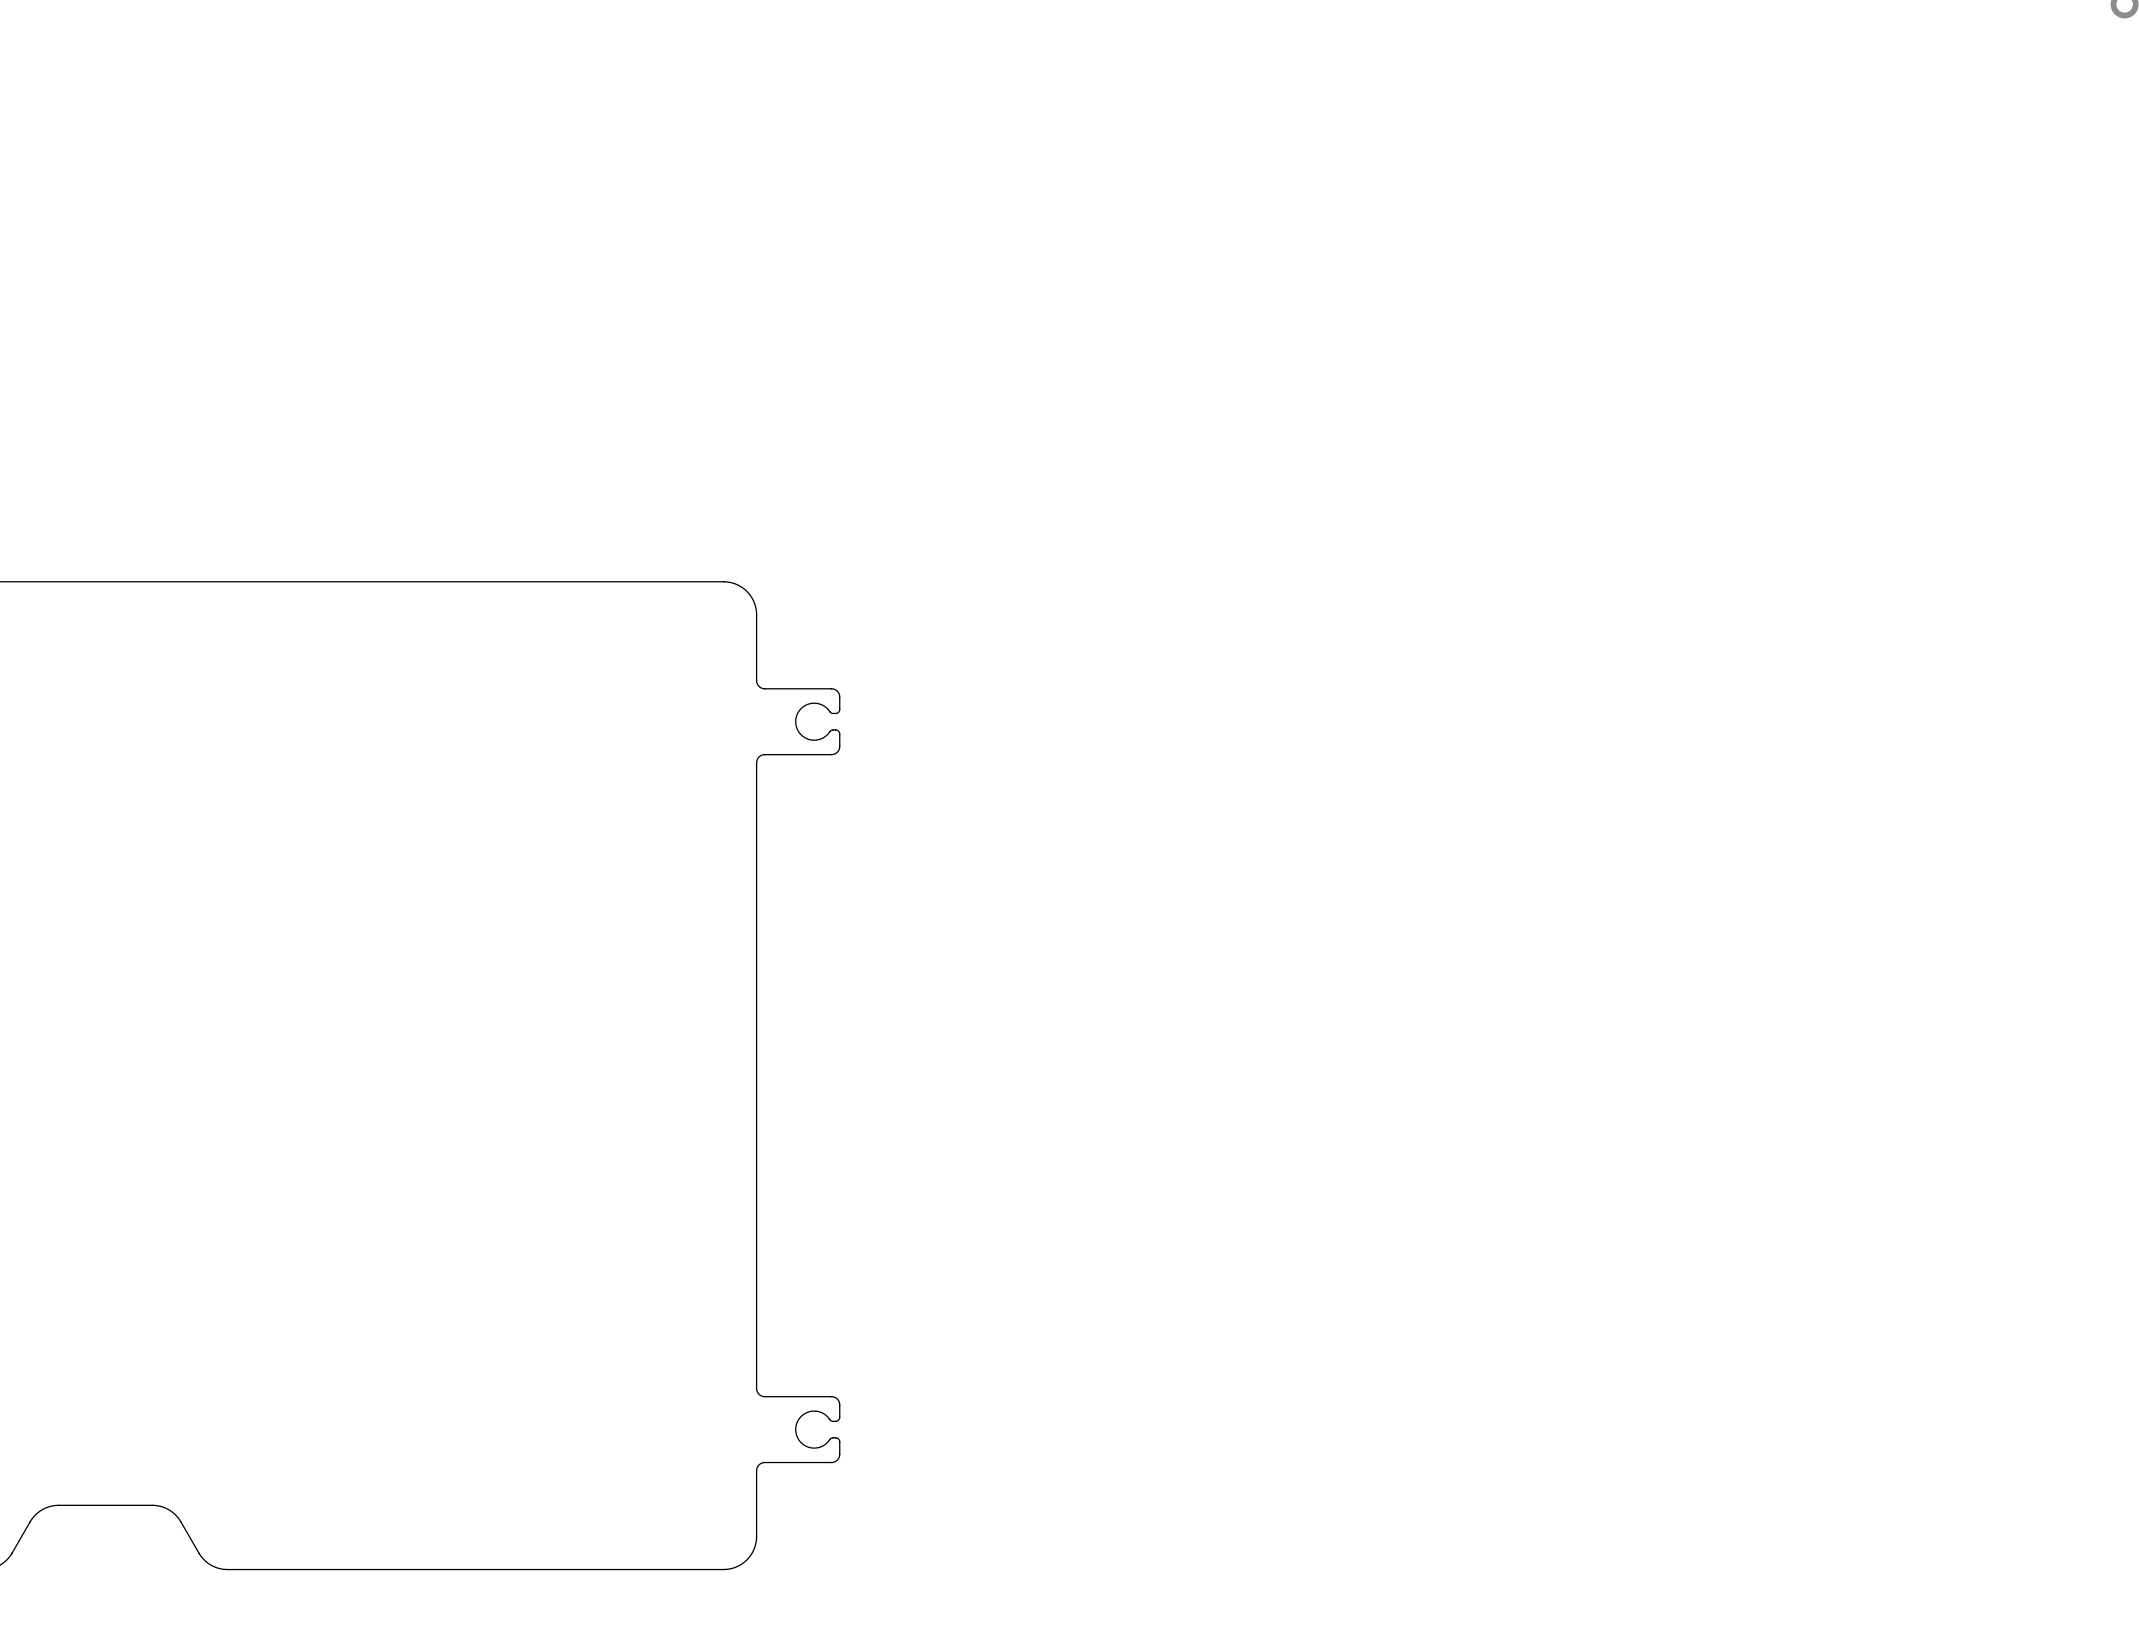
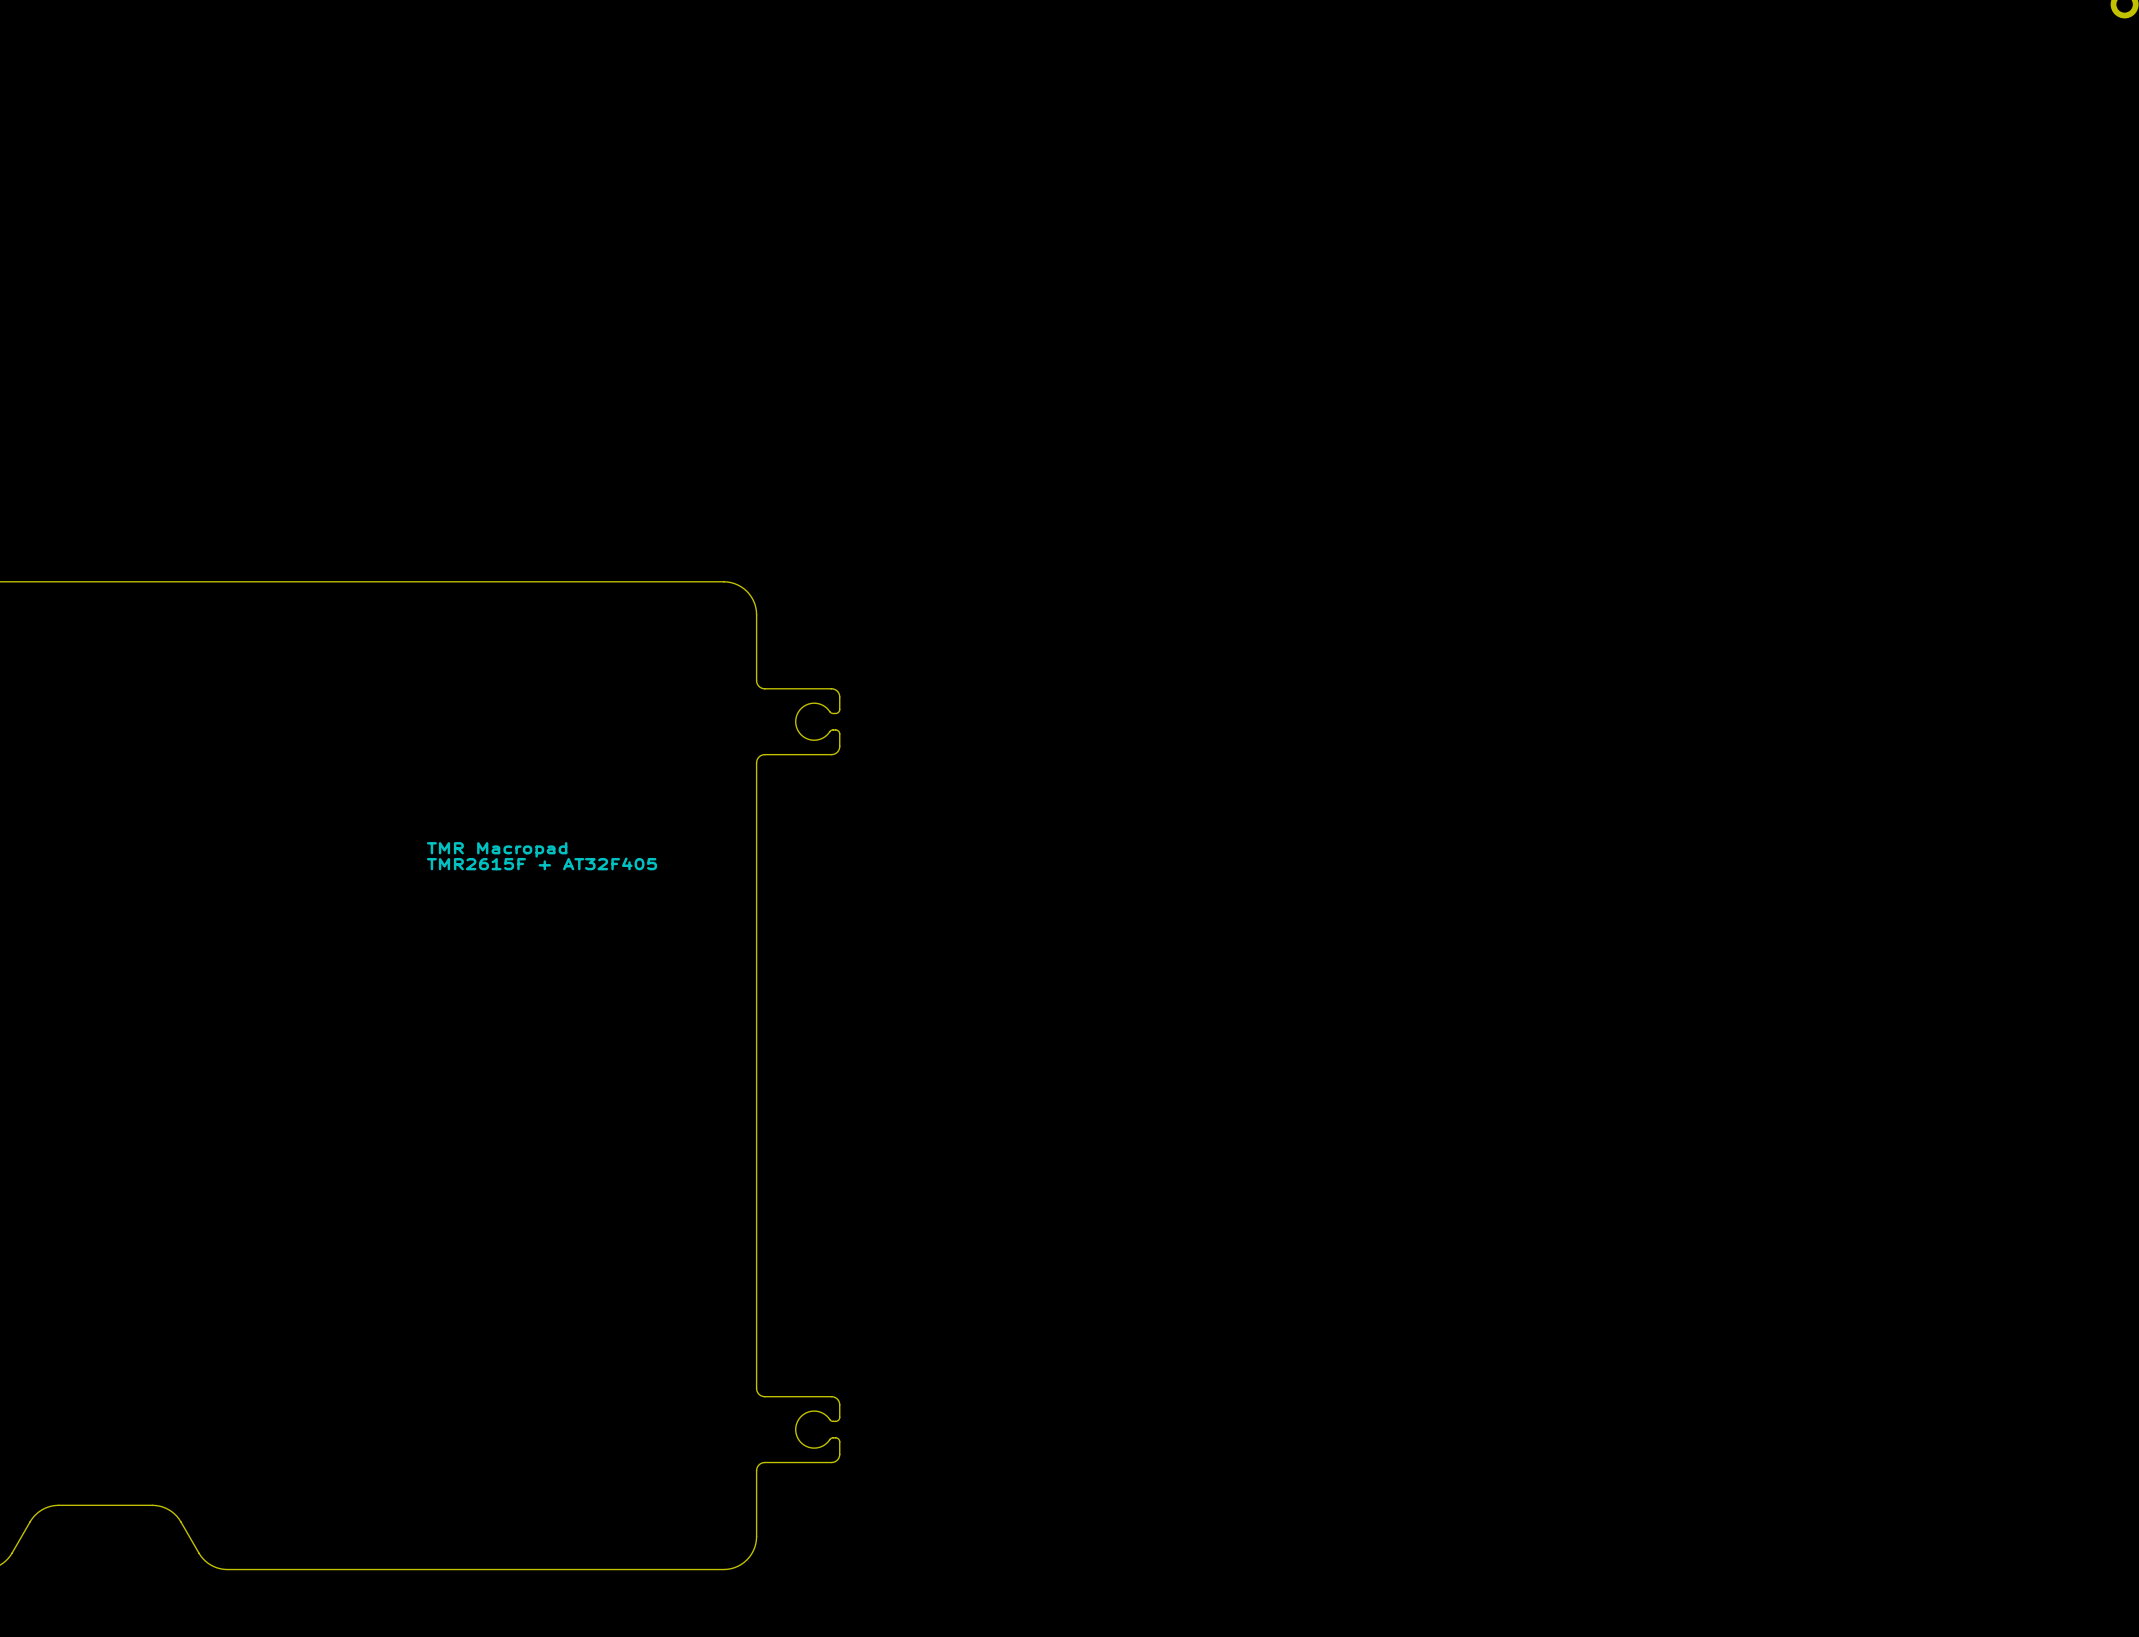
text: none -> TMR Macropad (497, 849)
text: none -> TMR2615F + AT32F405 (541, 863)

